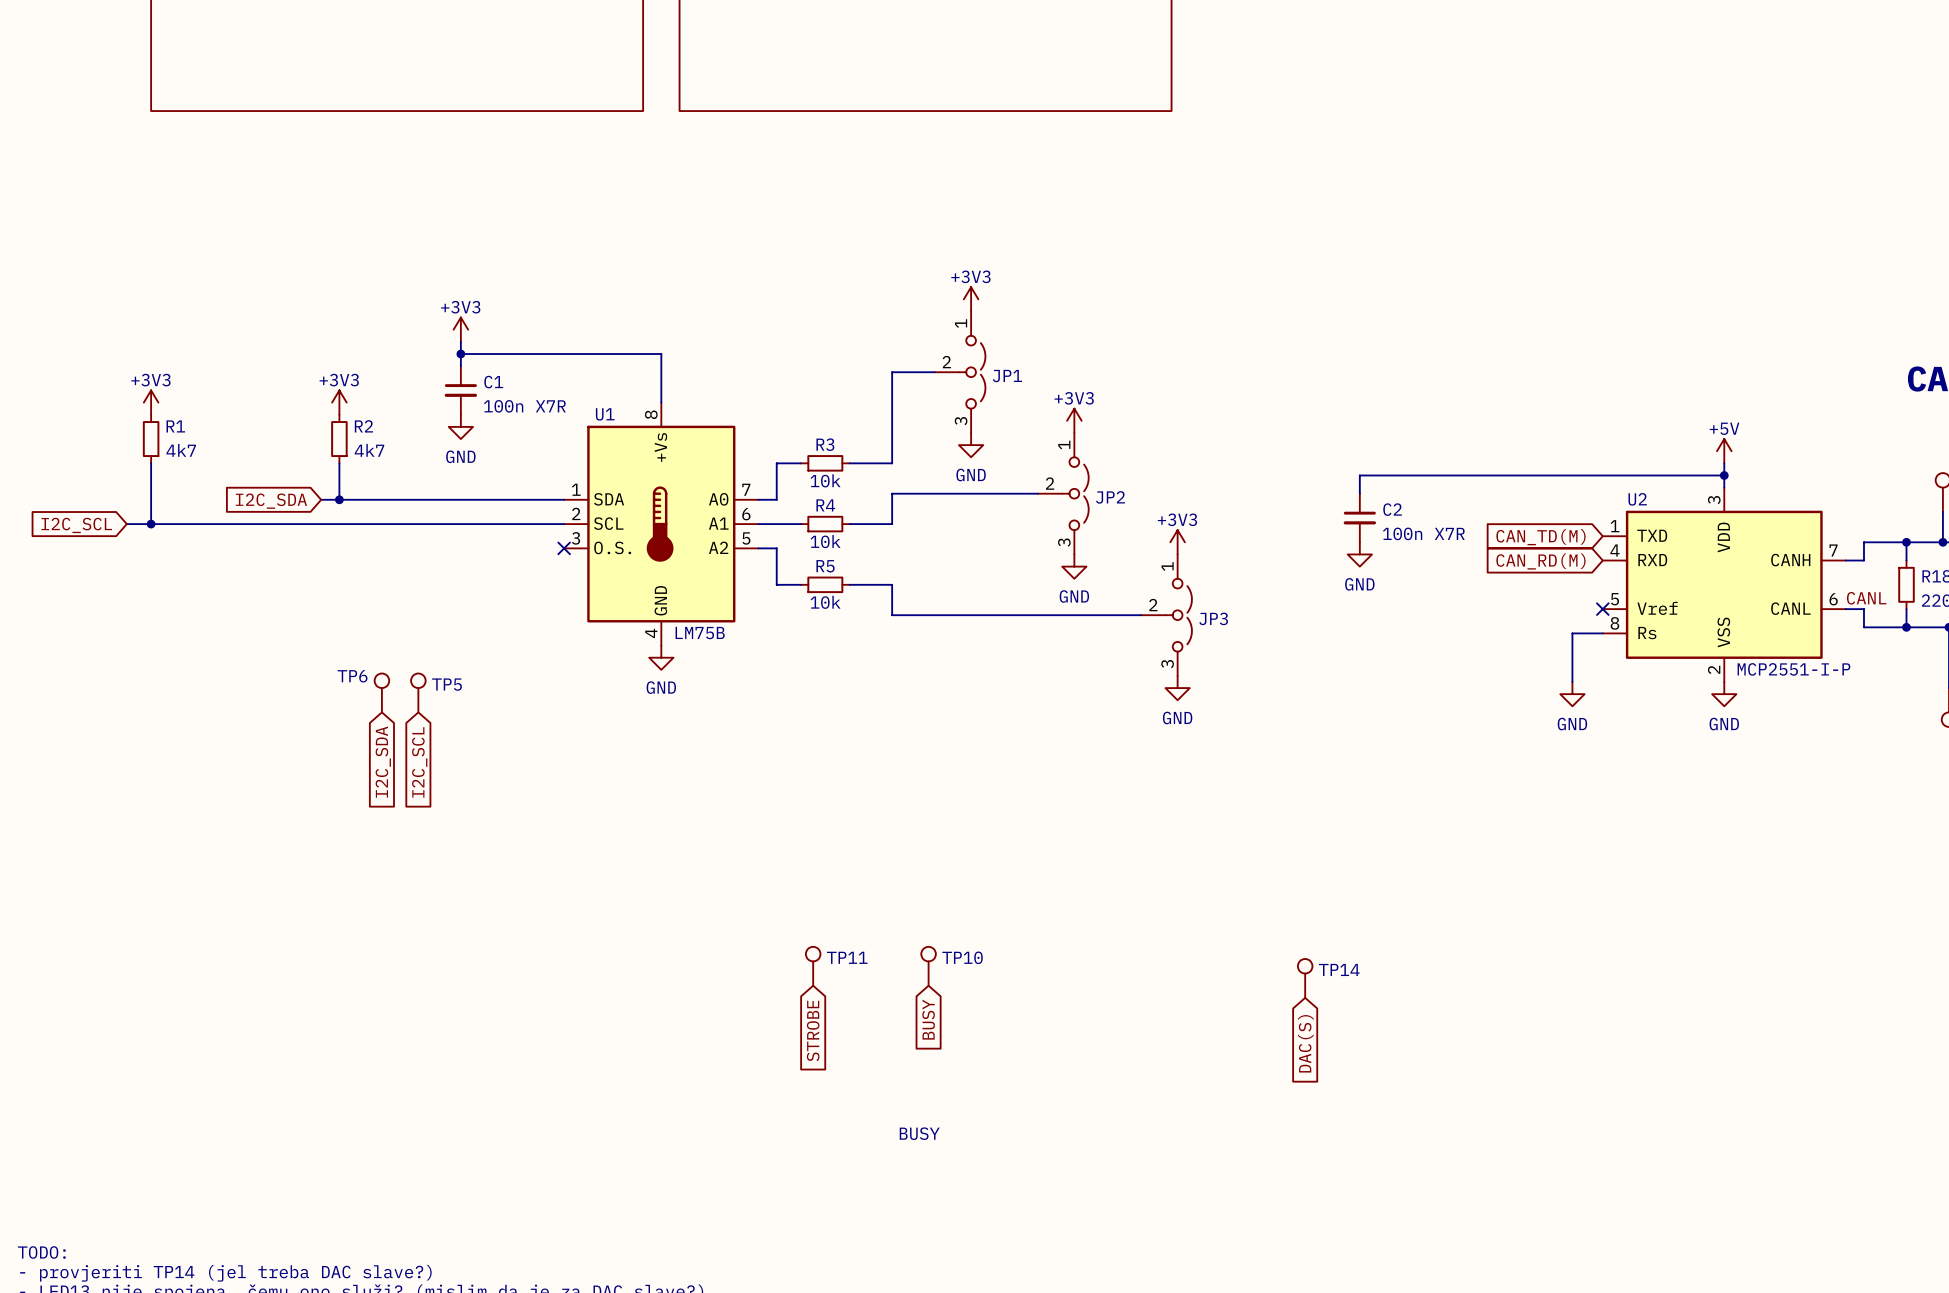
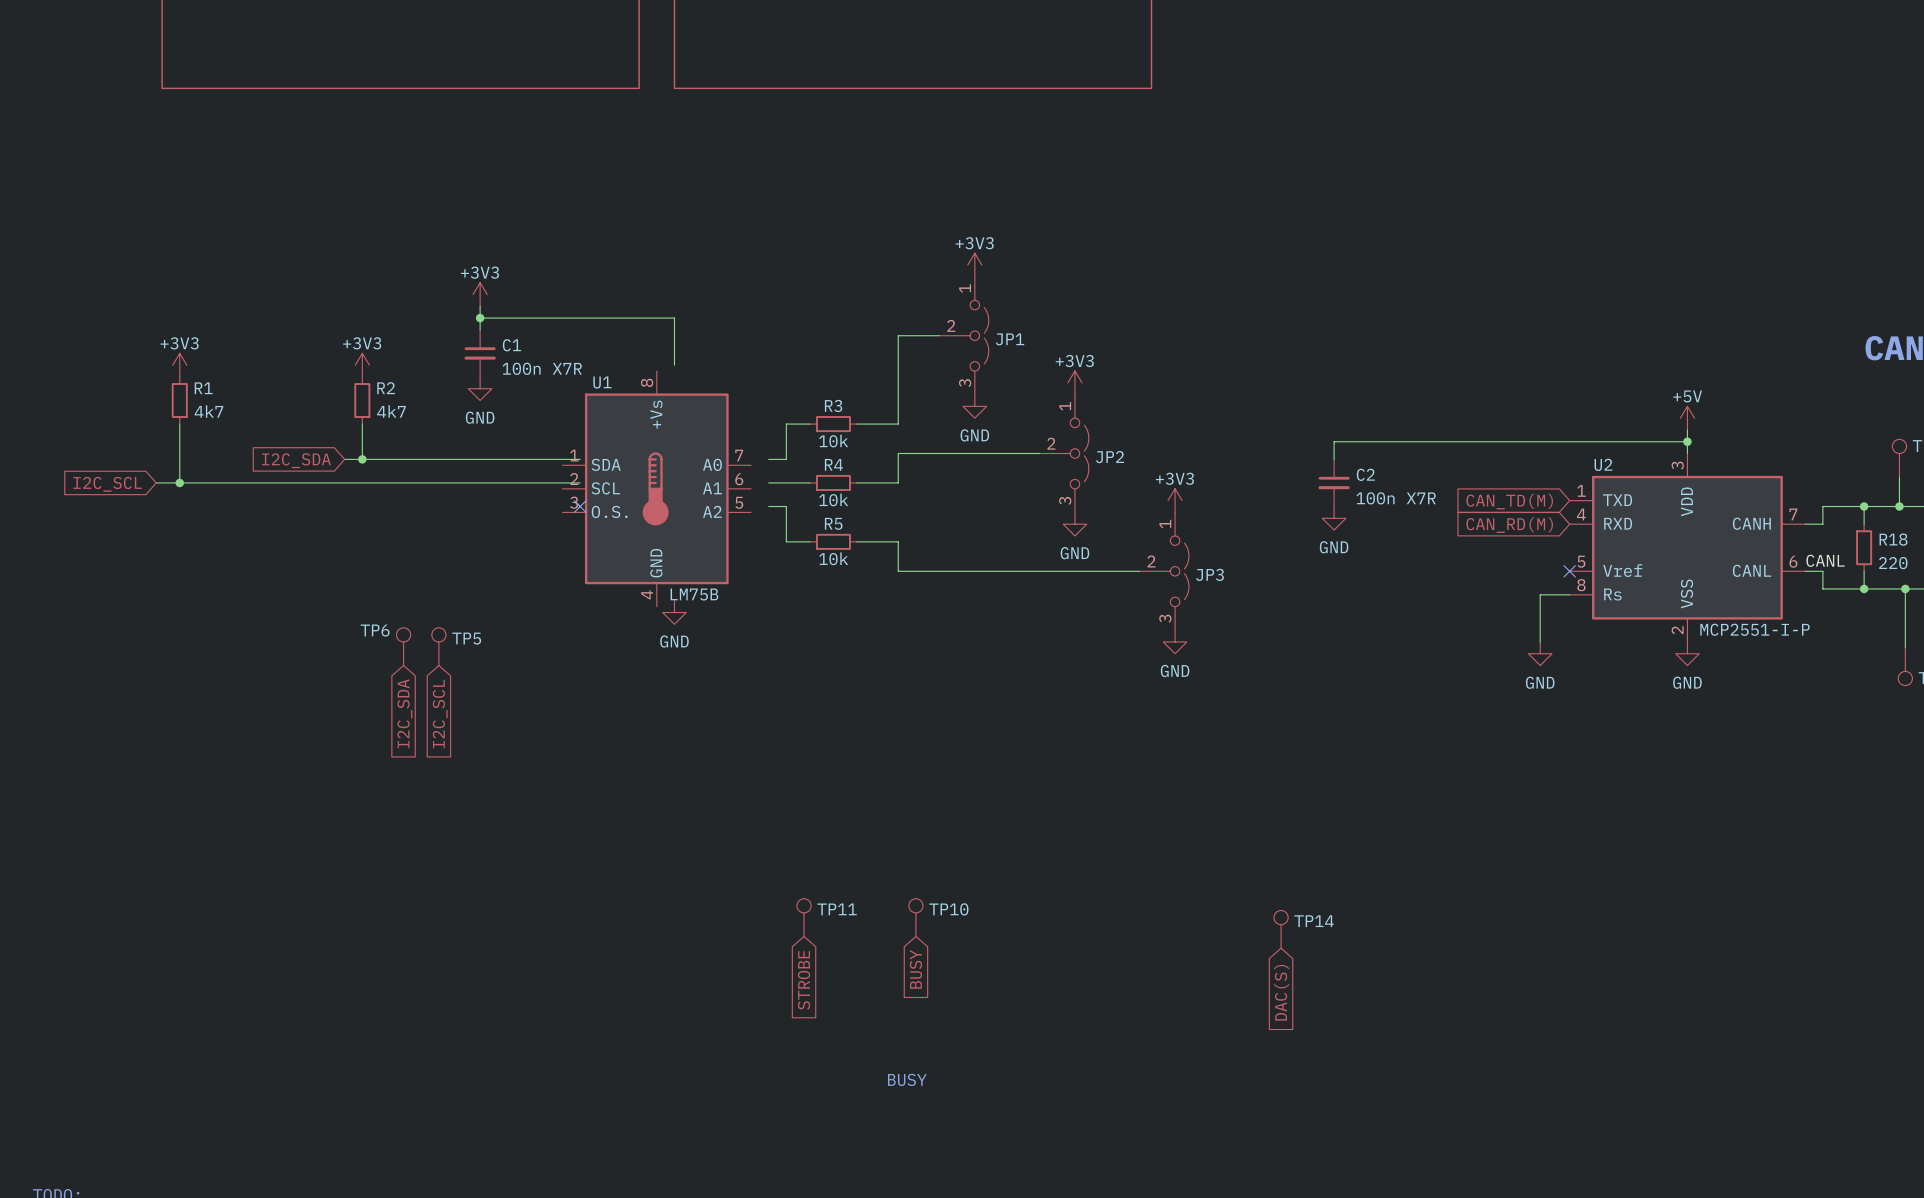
power symbol position: +3V3 (971, 299) -> +3V3 (974, 265)
power symbol position: +3V3 (460, 329) -> +3V3 (480, 294)
wire: (460, 341) (460, 366) -> (480, 306) (480, 329)
wire: (460, 354) (661, 354) (661, 402) -> (480, 318) (674, 318) (674, 365)
junction position: (460, 354) -> (480, 318)
wire: (934, 372) (892, 372) (892, 463) (849, 463) -> (939, 335) (898, 335) (898, 424) (857, 424)
JP1 position: (960, 372) -> (964, 335)
C1 position: (460, 390) -> (480, 353)
power symbol position: +3V3 (151, 402) -> +3V3 (179, 365)
power symbol position: +3V3 (339, 402) -> +3V3 (362, 365)
power symbol position: +3V3 (1074, 420) -> +3V3 (1074, 382)
power symbol position: GND (460, 426) -> GND (480, 388)
R1 position: (151, 439) -> (179, 400)
R2 position: (339, 439) -> (362, 400)
power symbol position: GND (971, 445) -> GND (974, 406)
wire: (151, 463) (151, 524) -> (179, 424) (179, 482)
wire: (339, 463) (339, 499) -> (362, 424) (362, 459)
wire: (801, 463) (776, 463) (776, 499) (758, 499) -> (809, 424) (786, 424) (786, 459) (768, 459)
R3 position: (825, 463) -> (833, 424)
wire: (1037, 493) (892, 493) (892, 524) (849, 524) -> (1039, 453) (898, 453) (898, 482) (857, 482)
JP2 position: (1063, 493) -> (1064, 453)
wire: (321, 499) (564, 499) -> (344, 459) (580, 459)
junction position: (339, 499) -> (362, 459)
global label position: I2C_SDA (271, 501) -> I2C_SDA (296, 460)
wire: (126, 524) (564, 524) -> (156, 482) (580, 482)
junction position: (151, 524) -> (179, 482)
wire: (758, 524) (801, 524) -> (768, 482) (809, 482)
R4 position: (825, 524) -> (833, 482)
global label position: I2C_SCL (76, 525) -> I2C_SCL (107, 484)
power symbol position: +3V3 (1177, 542) -> +3V3 (1175, 500)
no-connect mark position: (564, 548) -> (580, 506)
wire: (758, 548) (776, 548) (776, 584) (801, 584) -> (768, 506) (786, 506) (786, 541) (809, 541)
power symbol position: GND (1074, 566) -> GND (1074, 524)
R5 position: (825, 584) -> (833, 541)
wire: (849, 584) (892, 584) (892, 615) (1141, 615) -> (857, 541) (898, 541) (898, 571) (1139, 571)
JP3 position: (1166, 615) -> (1164, 571)
power symbol position: GND (661, 657) -> GND (674, 612)
power symbol position: GND (1177, 688) -> GND (1175, 641)
TP6 position: (381, 692) -> (403, 646)
TP5 position: (418, 692) -> (438, 646)
global label position: I2C_SDA (383, 762) -> I2C_SDA (404, 713)
global label position: I2C_SCL (419, 762) -> I2C_SCL (440, 714)

